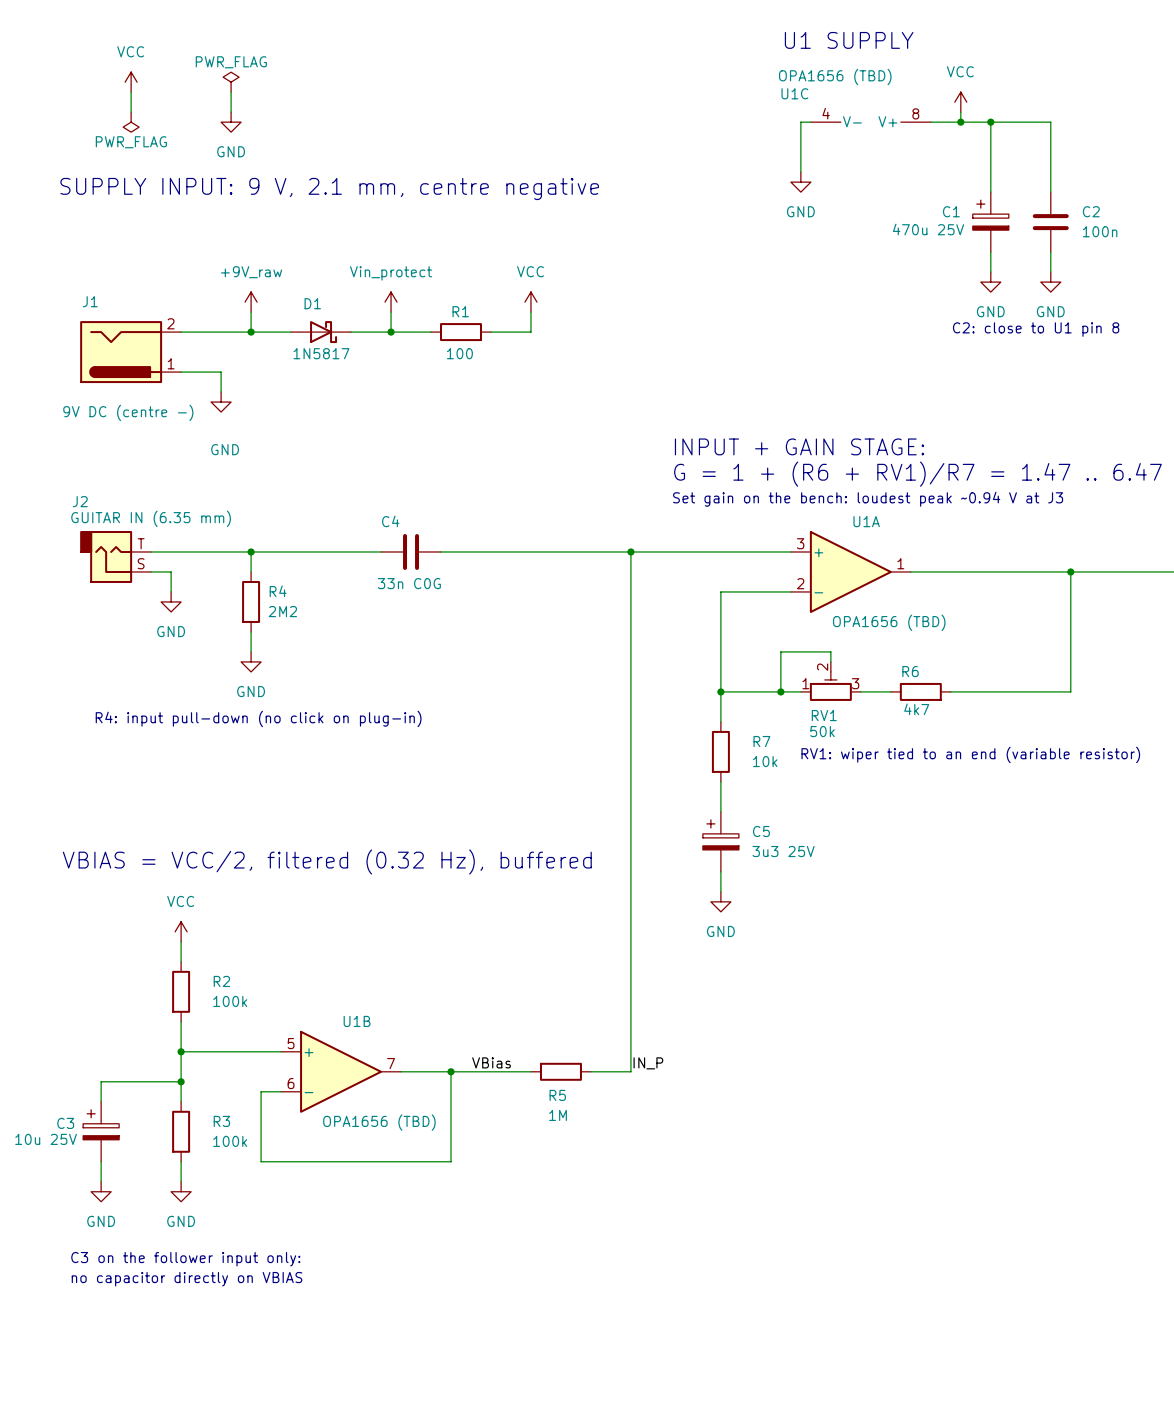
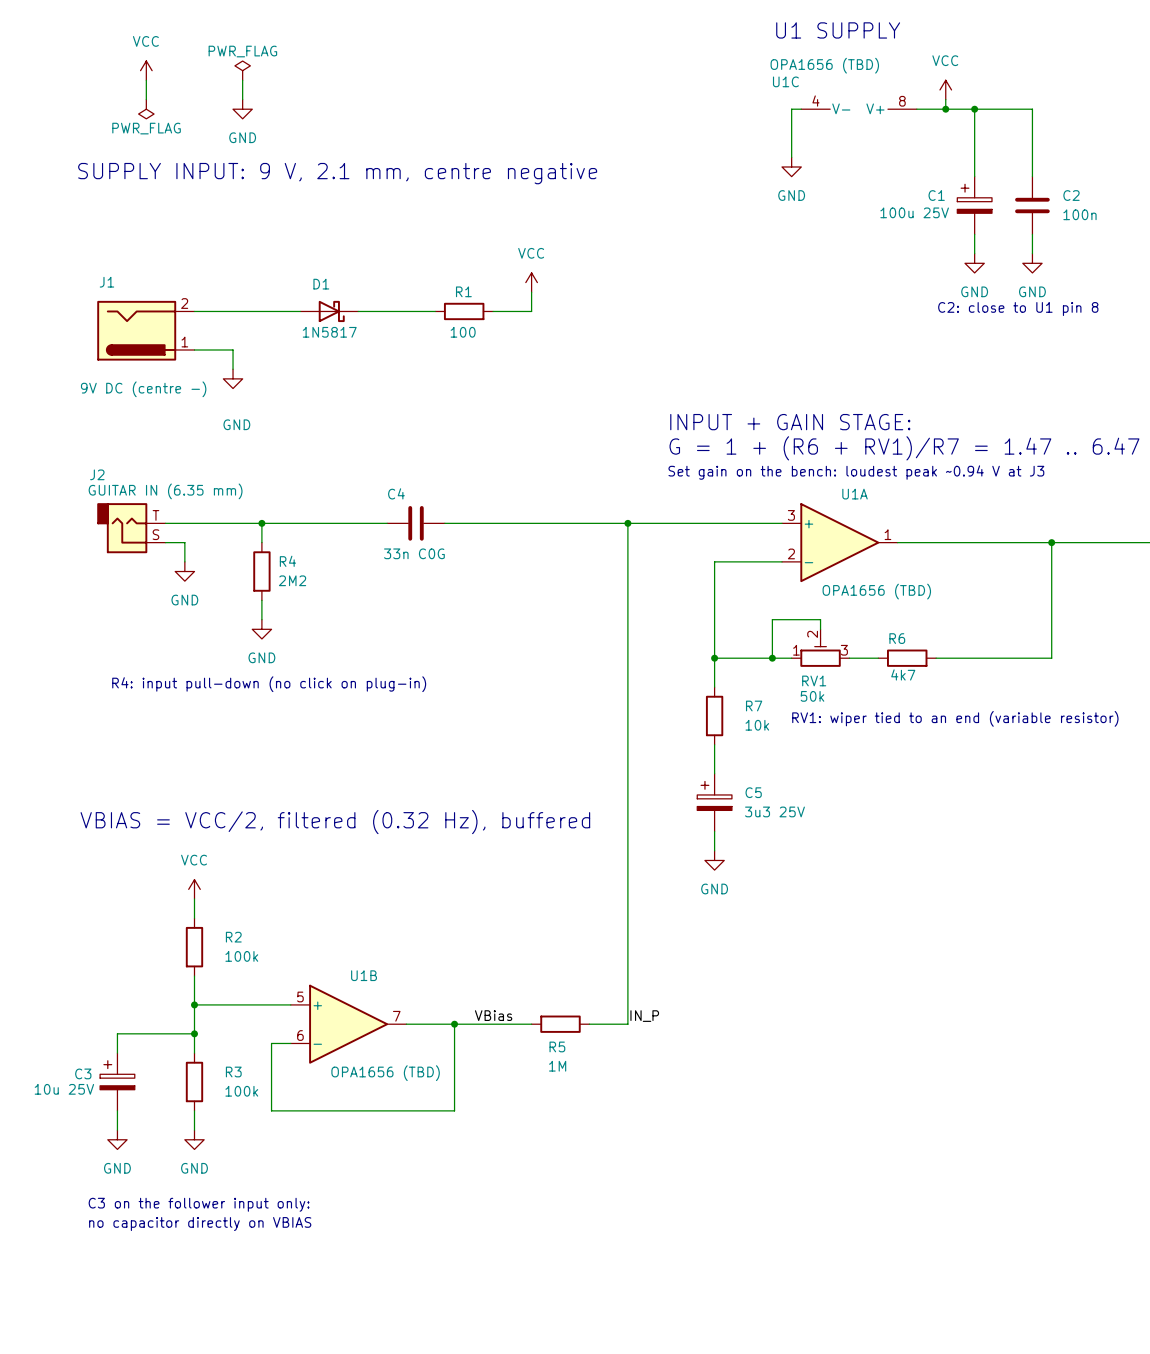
C1 value: 470u 25V (928, 229) -> 100u 25V (914, 212)
power symbol: +9V_raw (251, 302) -> none
power symbol: Vin_protect (391, 302) -> none
wire: (251, 312) (251, 332) -> none
wire: (391, 312) (391, 332) -> none
junction: (251, 332) -> none
junction: (391, 332) -> none

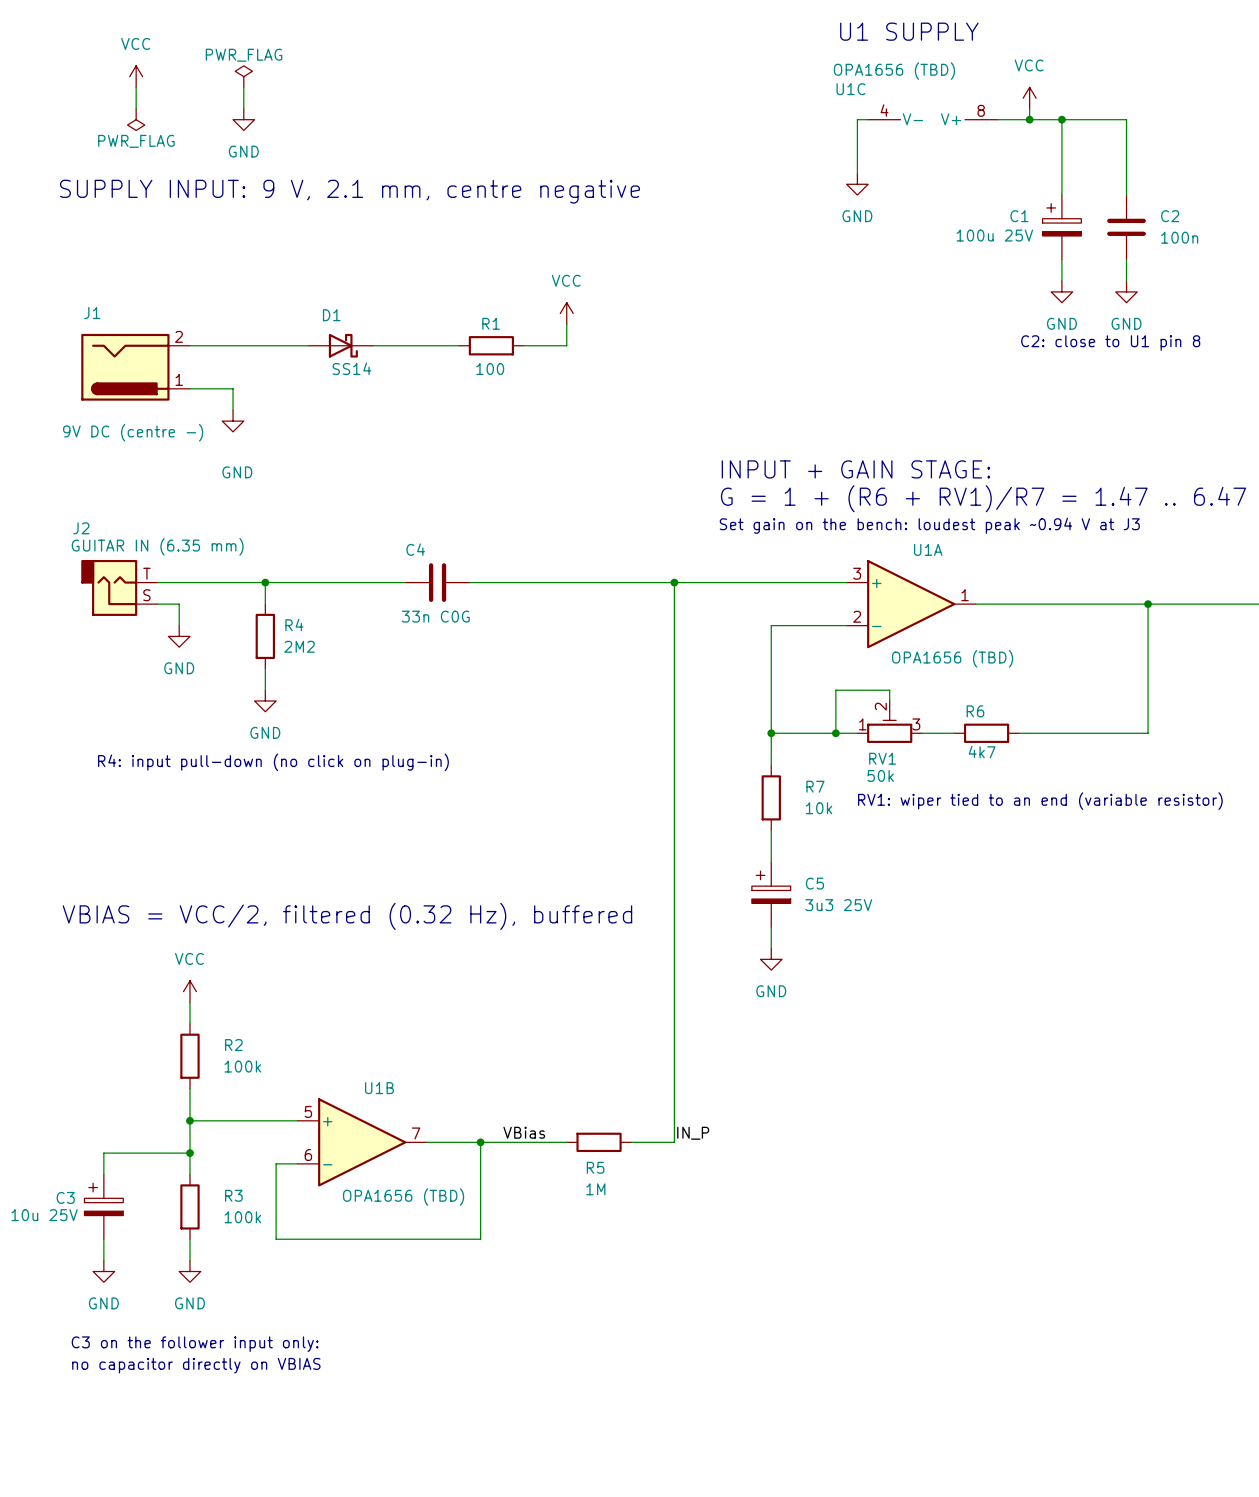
D1 value: 1N5817 (329, 332) -> SS14 (351, 368)

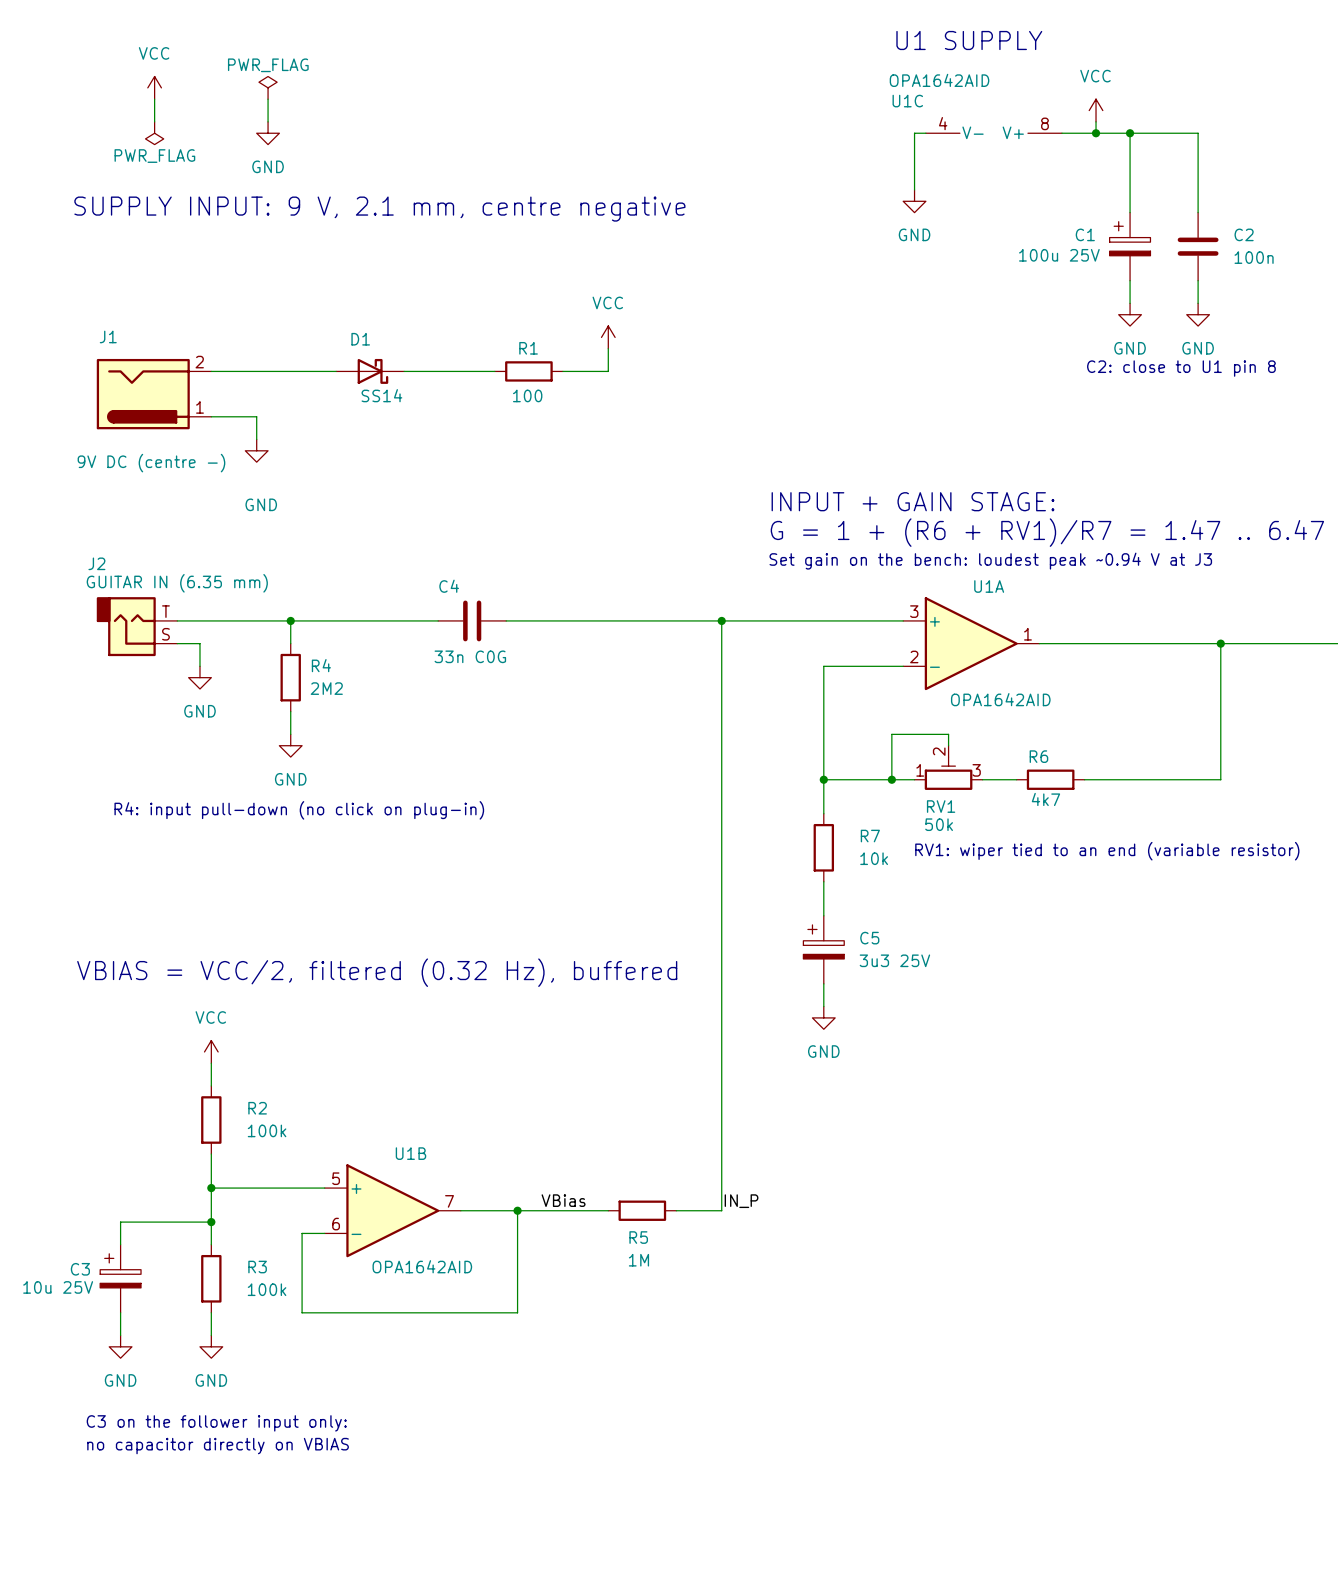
U1C value: OPA1656 (TBD) (894, 71) -> OPA1642AID (939, 80)
U1A value: OPA1656 (TBD) (952, 658) -> OPA1642AID (1000, 699)
U1B value: OPA1656 (TBD) (403, 1197) -> OPA1642AID (422, 1266)

